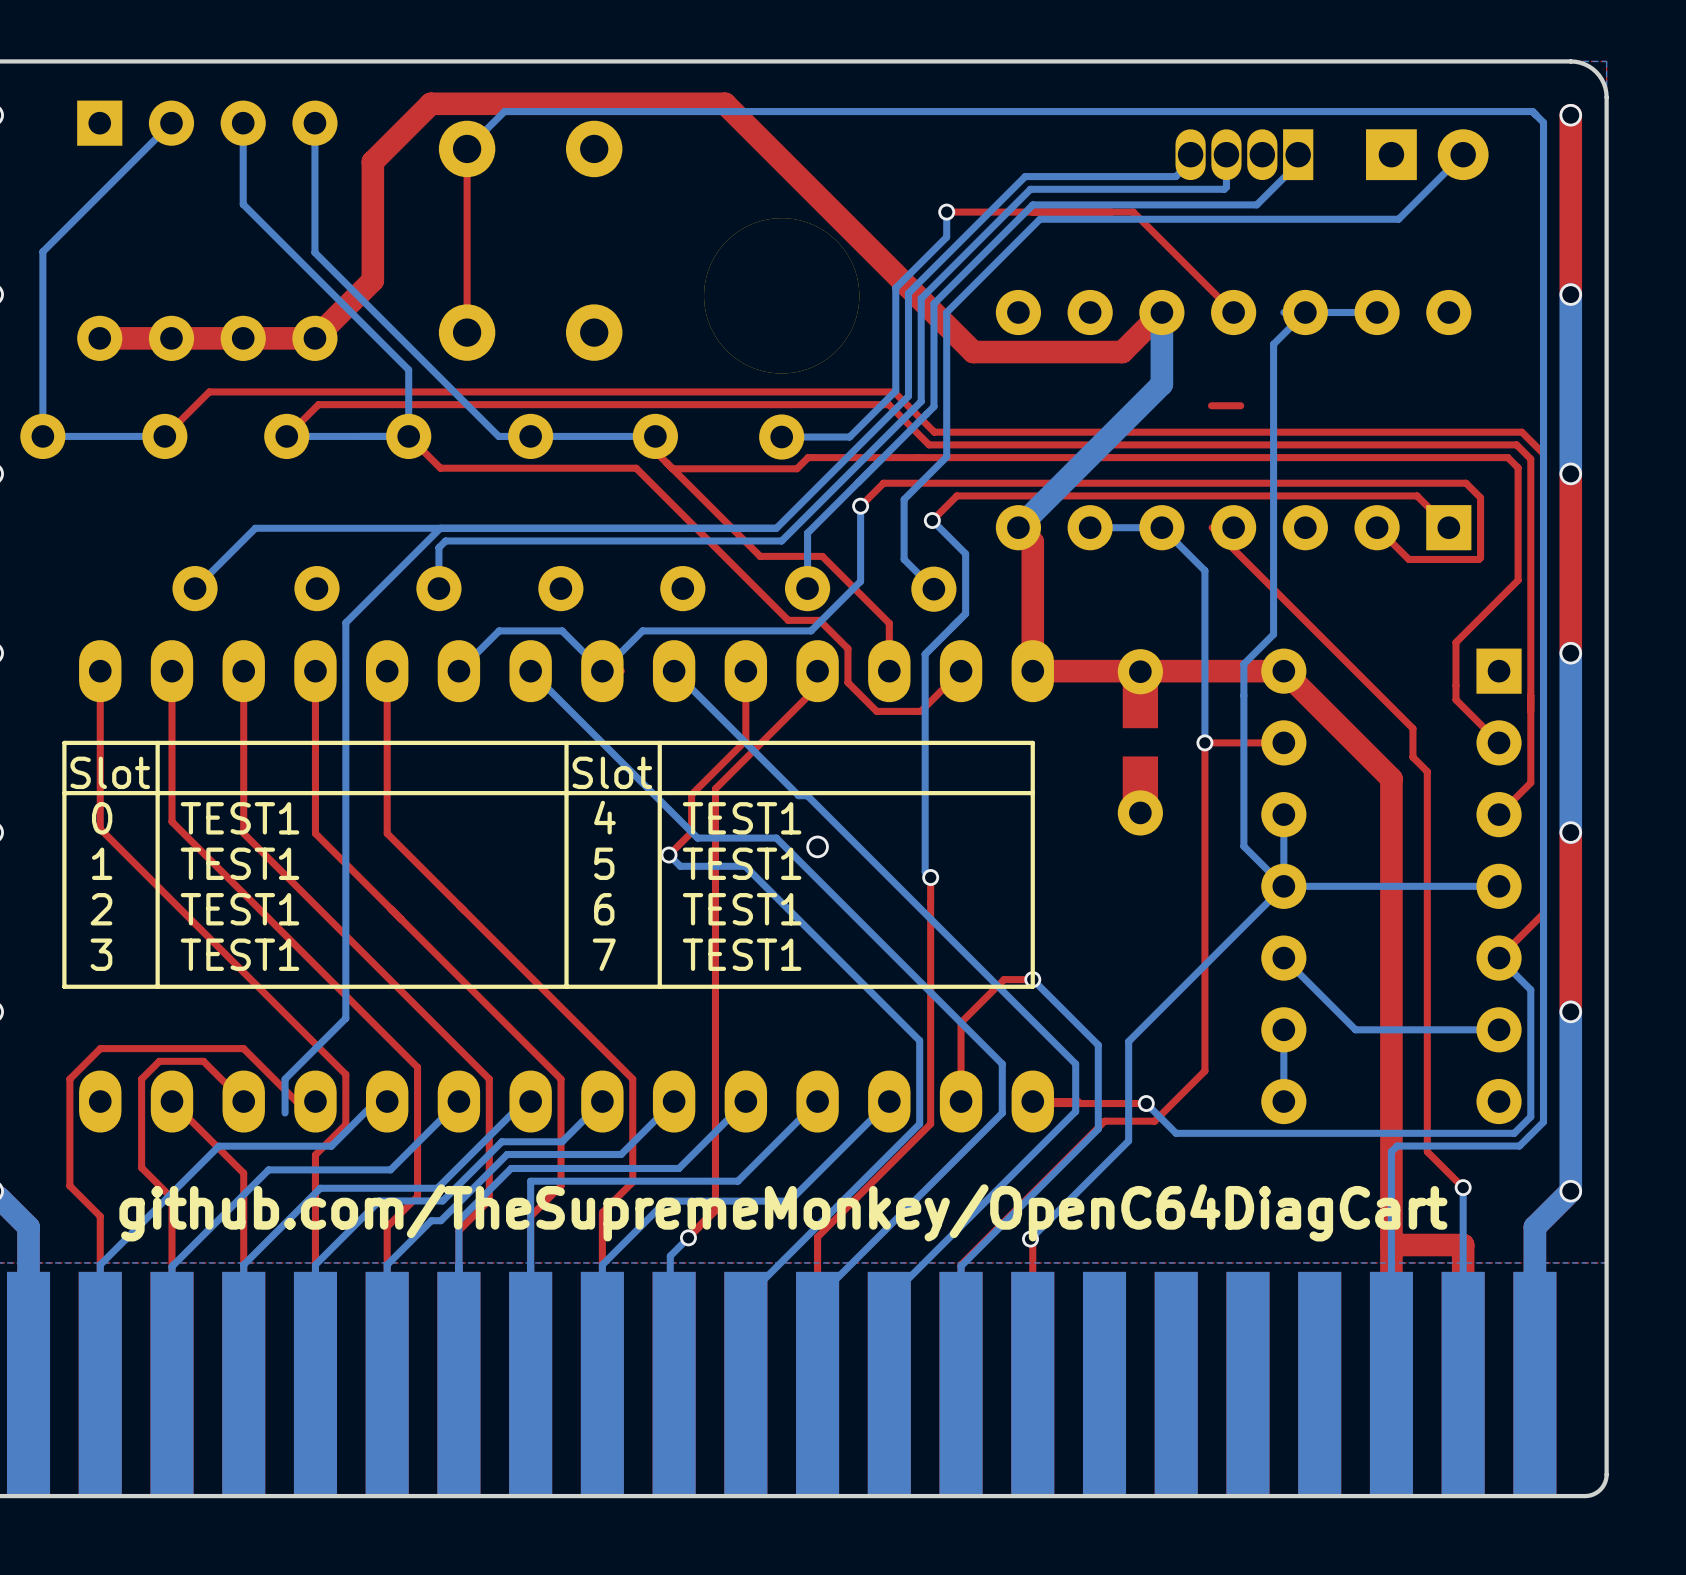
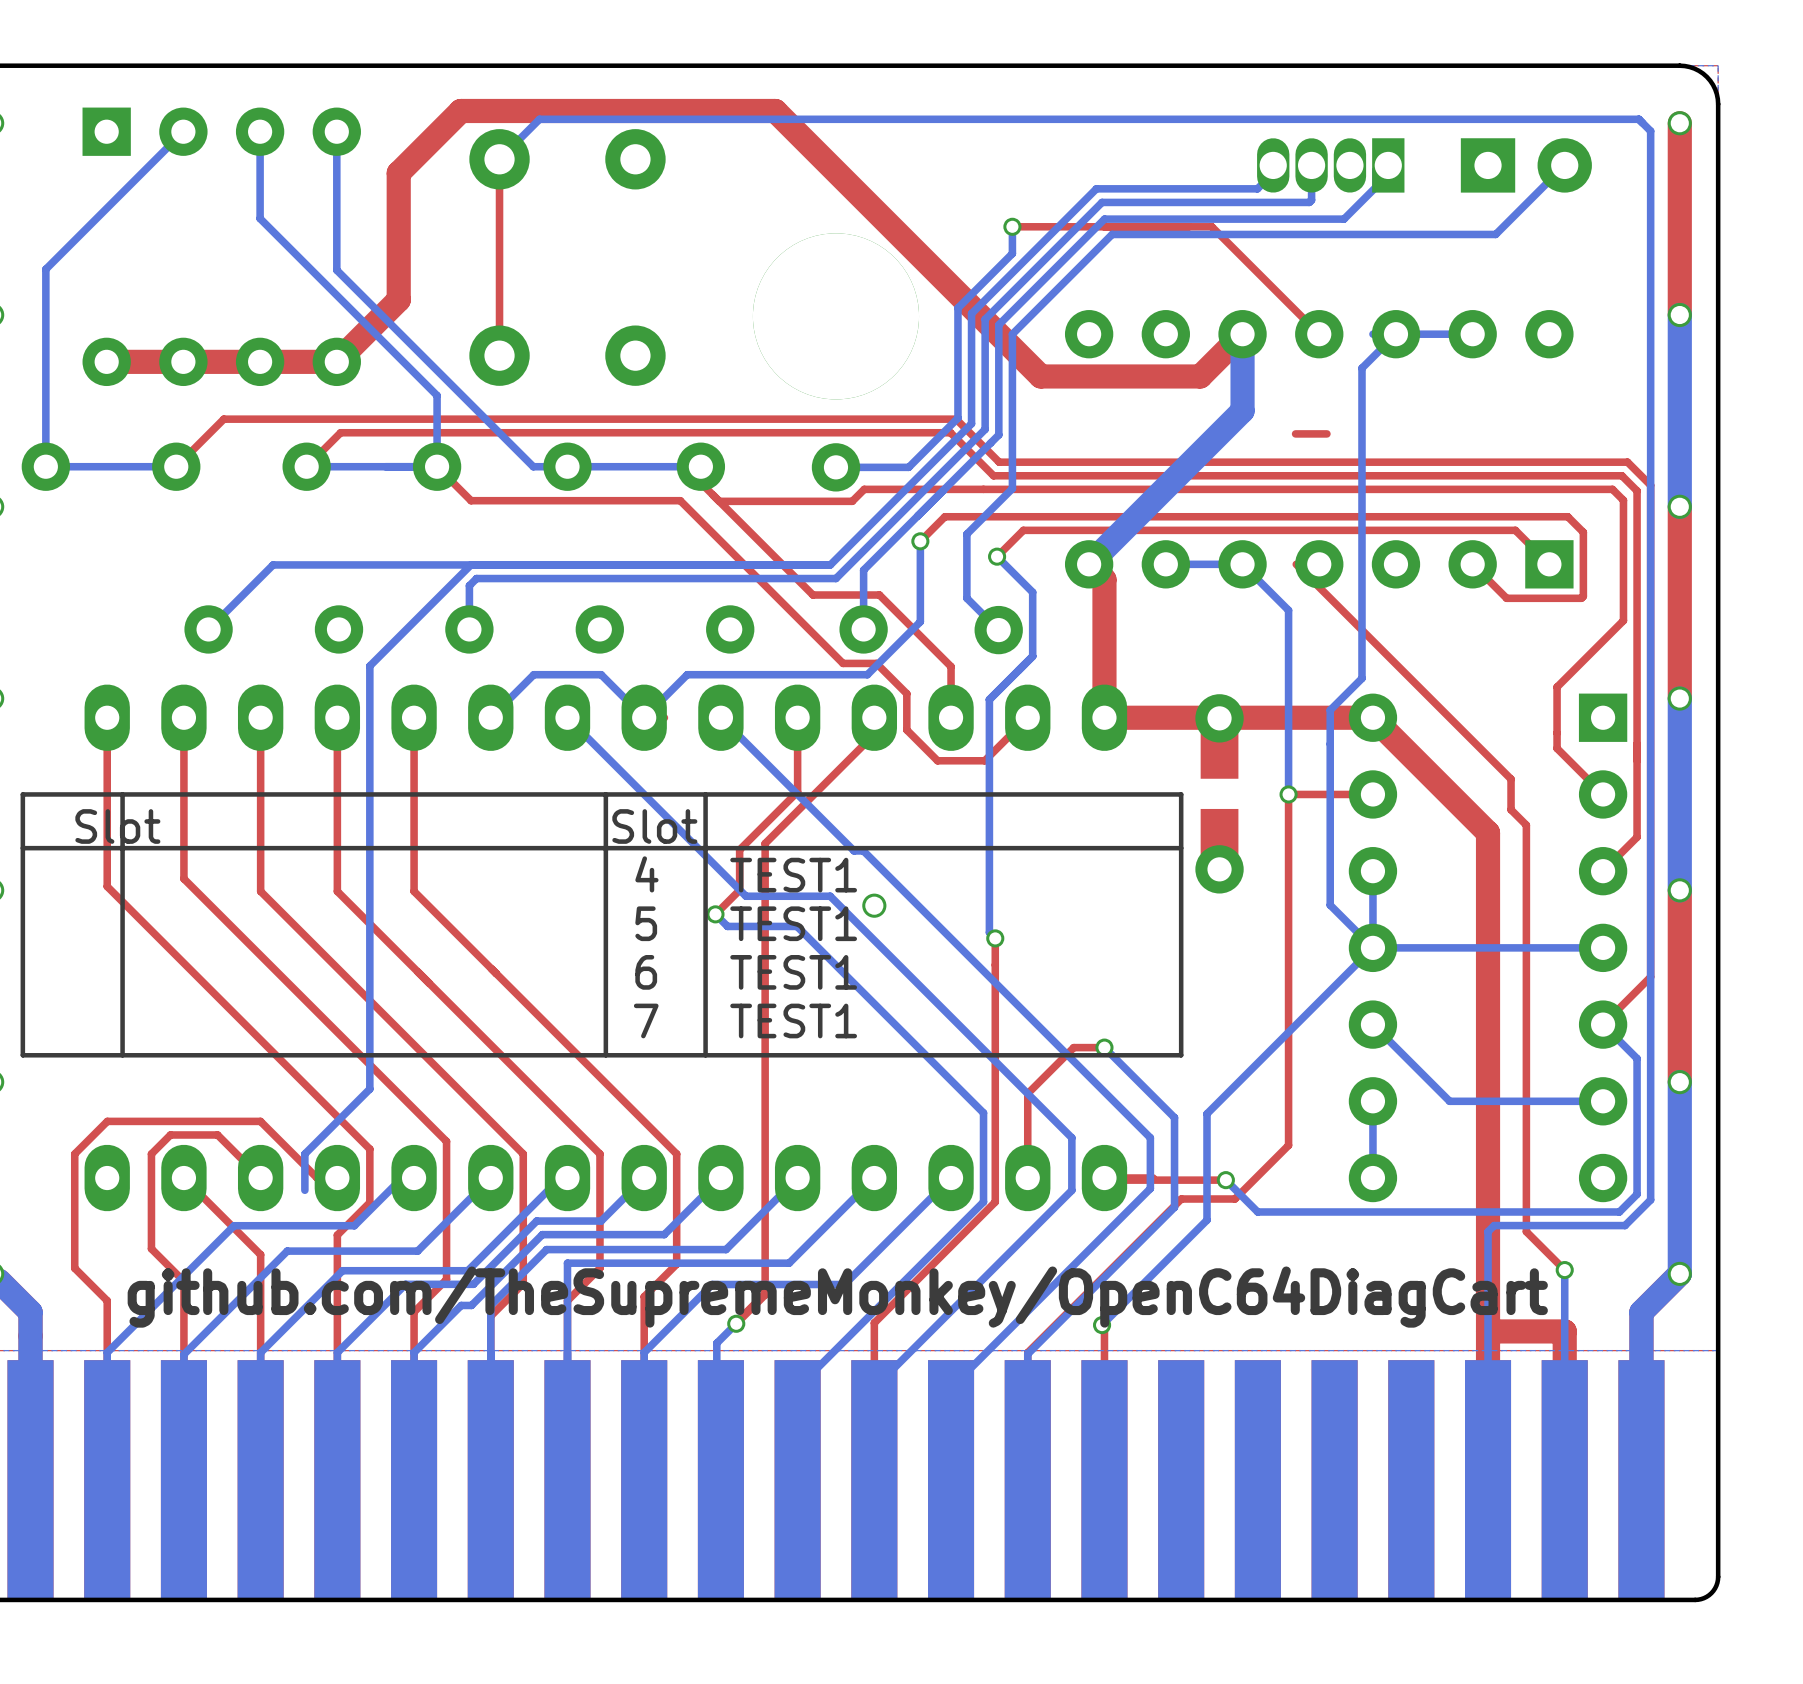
line: (64, 742) (64, 986) -> (68, 794) (22, 794) (22, 1055) (68, 1055)
line: (157, 742) (157, 986) -> (122, 794) (122, 1055)
line: (1032, 742) (1032, 986) -> (1104, 794) (1181, 794) (1181, 1055) (1104, 1055)
line: none -> (68, 848) (22, 848)
line: none -> (1181, 848) (1104, 848)
text: 0 TEST1 (195, 818) -> none
text: 1 TEST1 (195, 863) -> none
text: 2 TEST1 (194, 909) -> none
text: 3 TEST1 (194, 954) -> none

